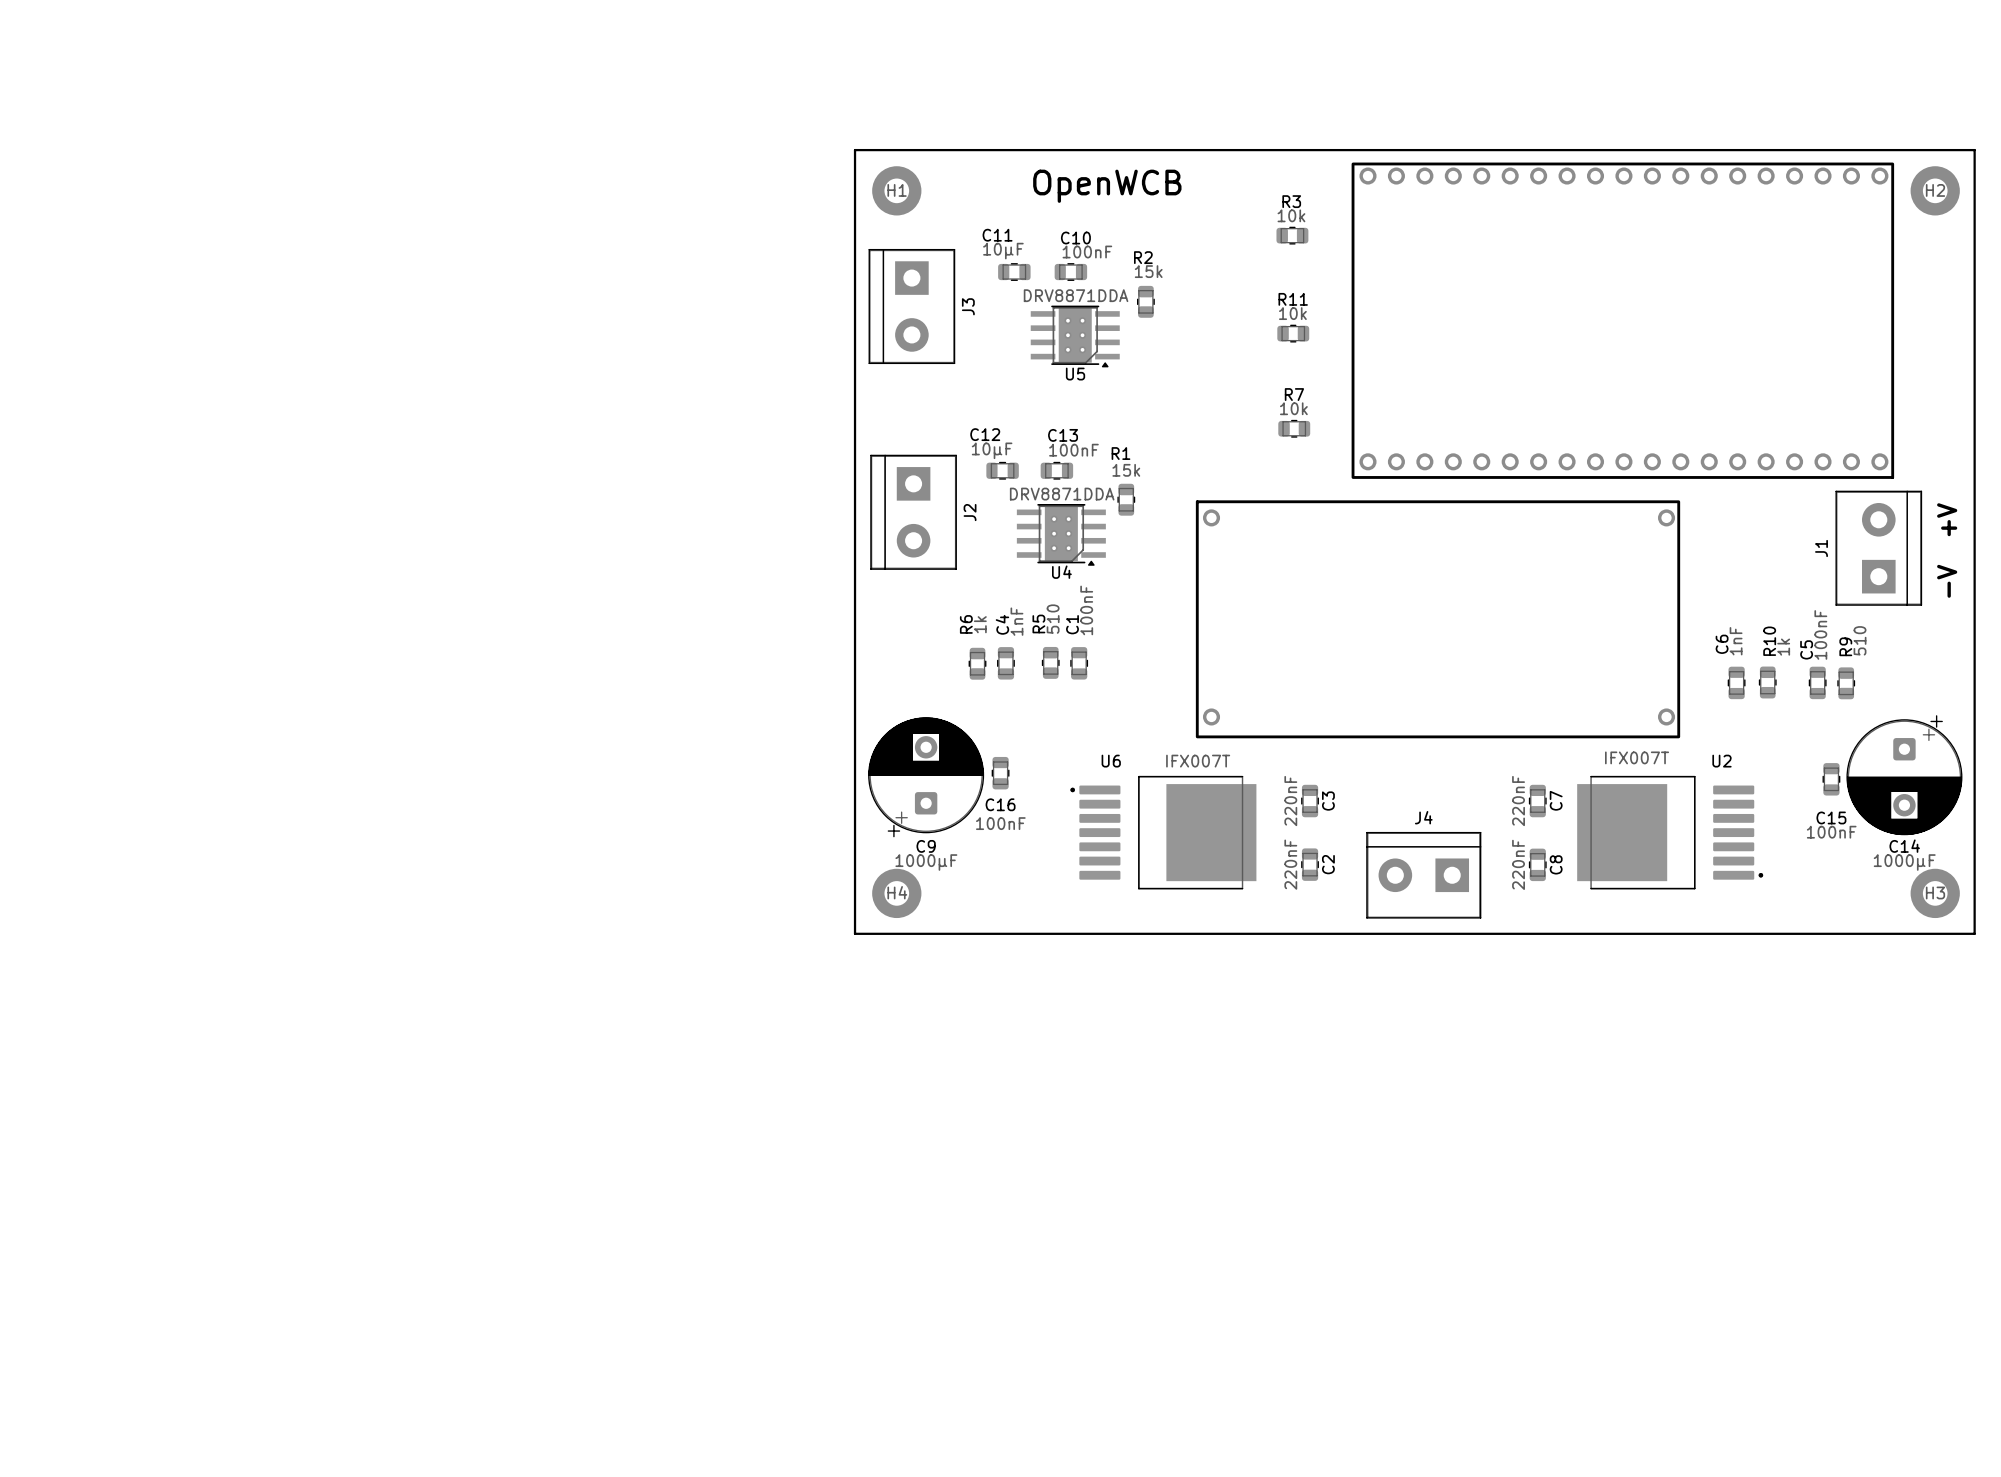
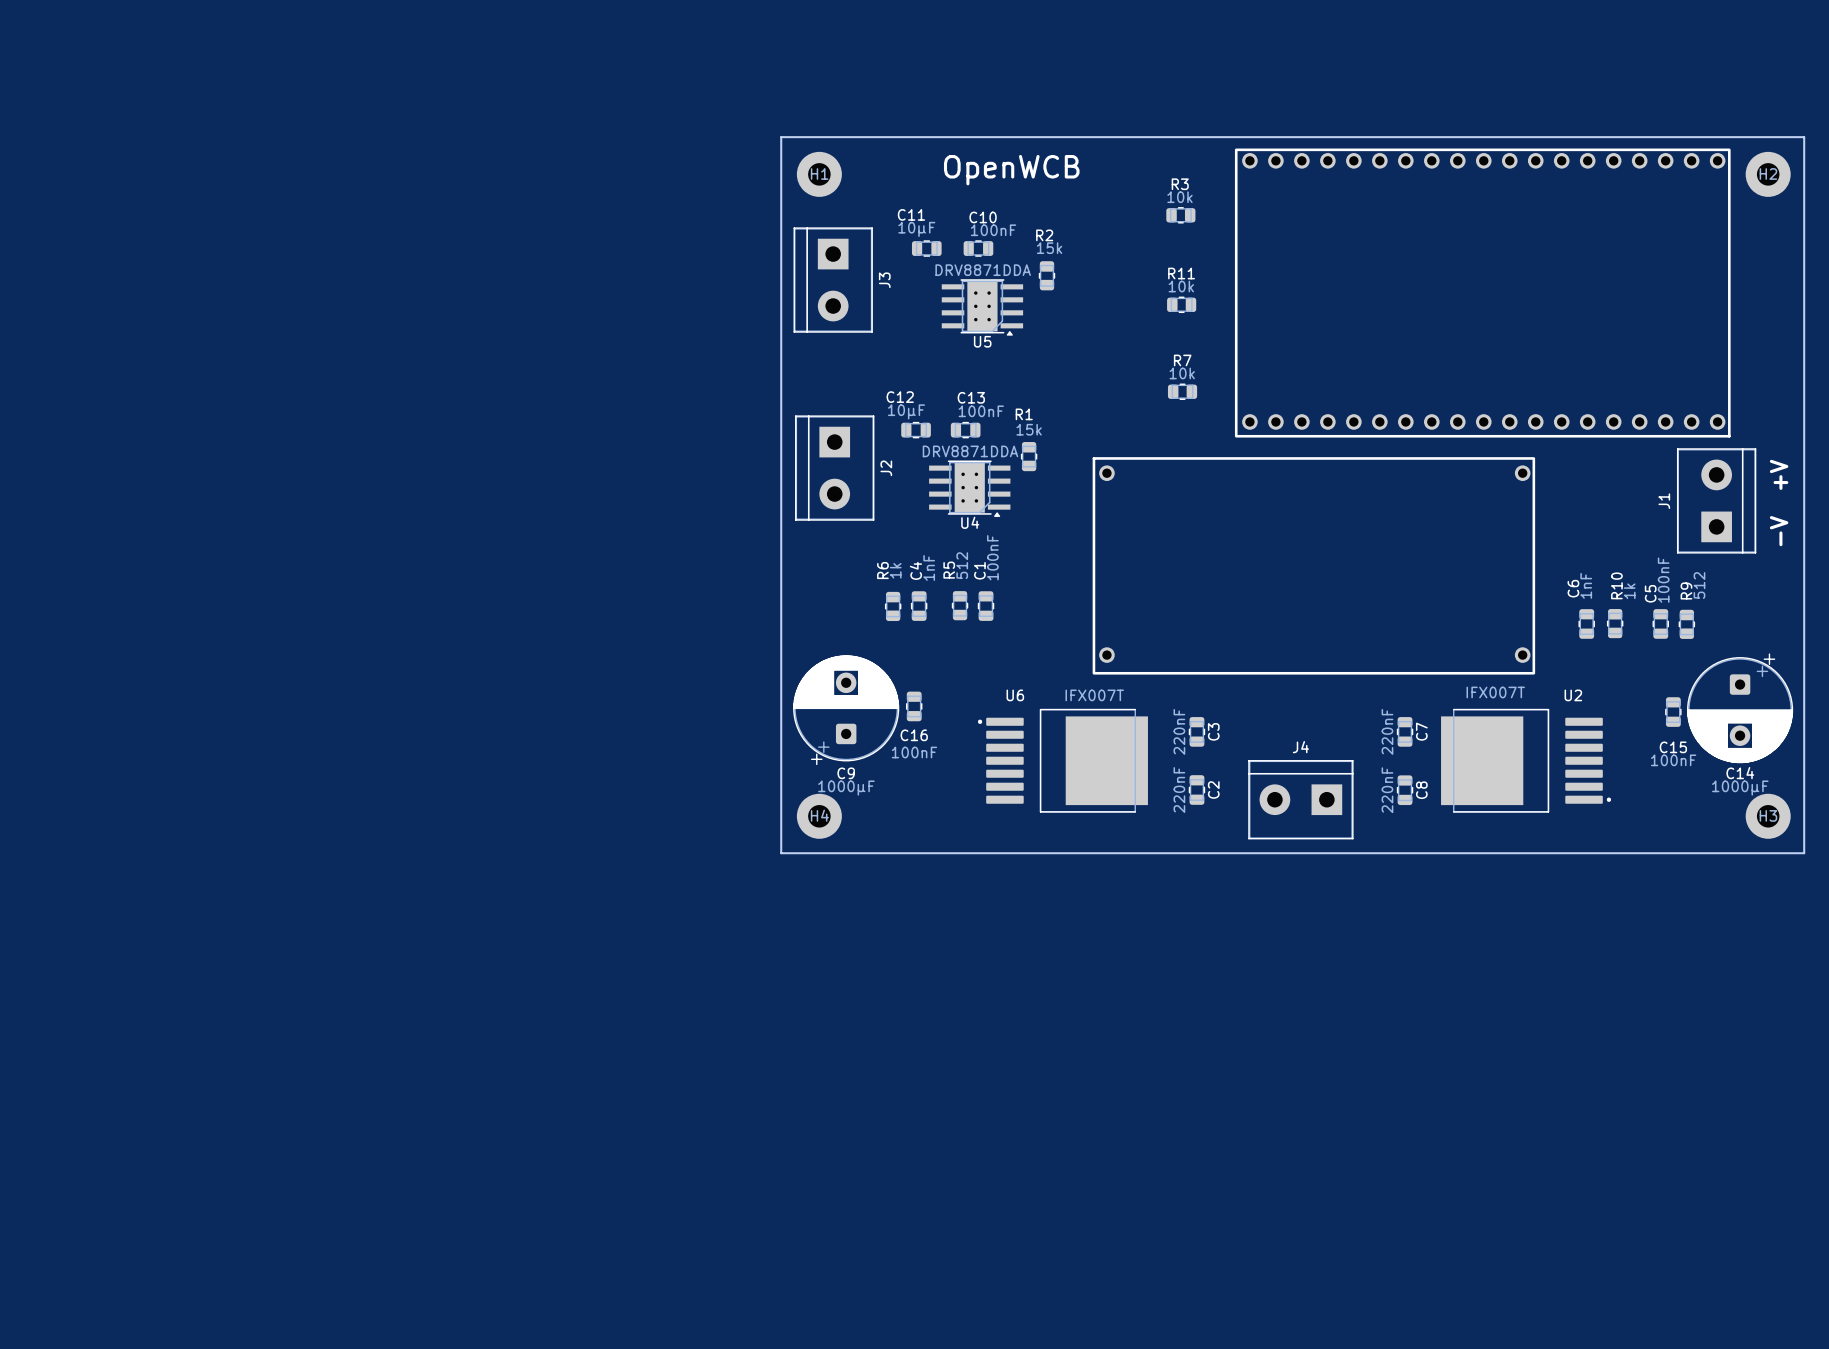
R5 value: 510 (1053, 619) -> 512 (962, 565)
R9 value: 510 (1860, 640) -> 512 (1699, 585)

